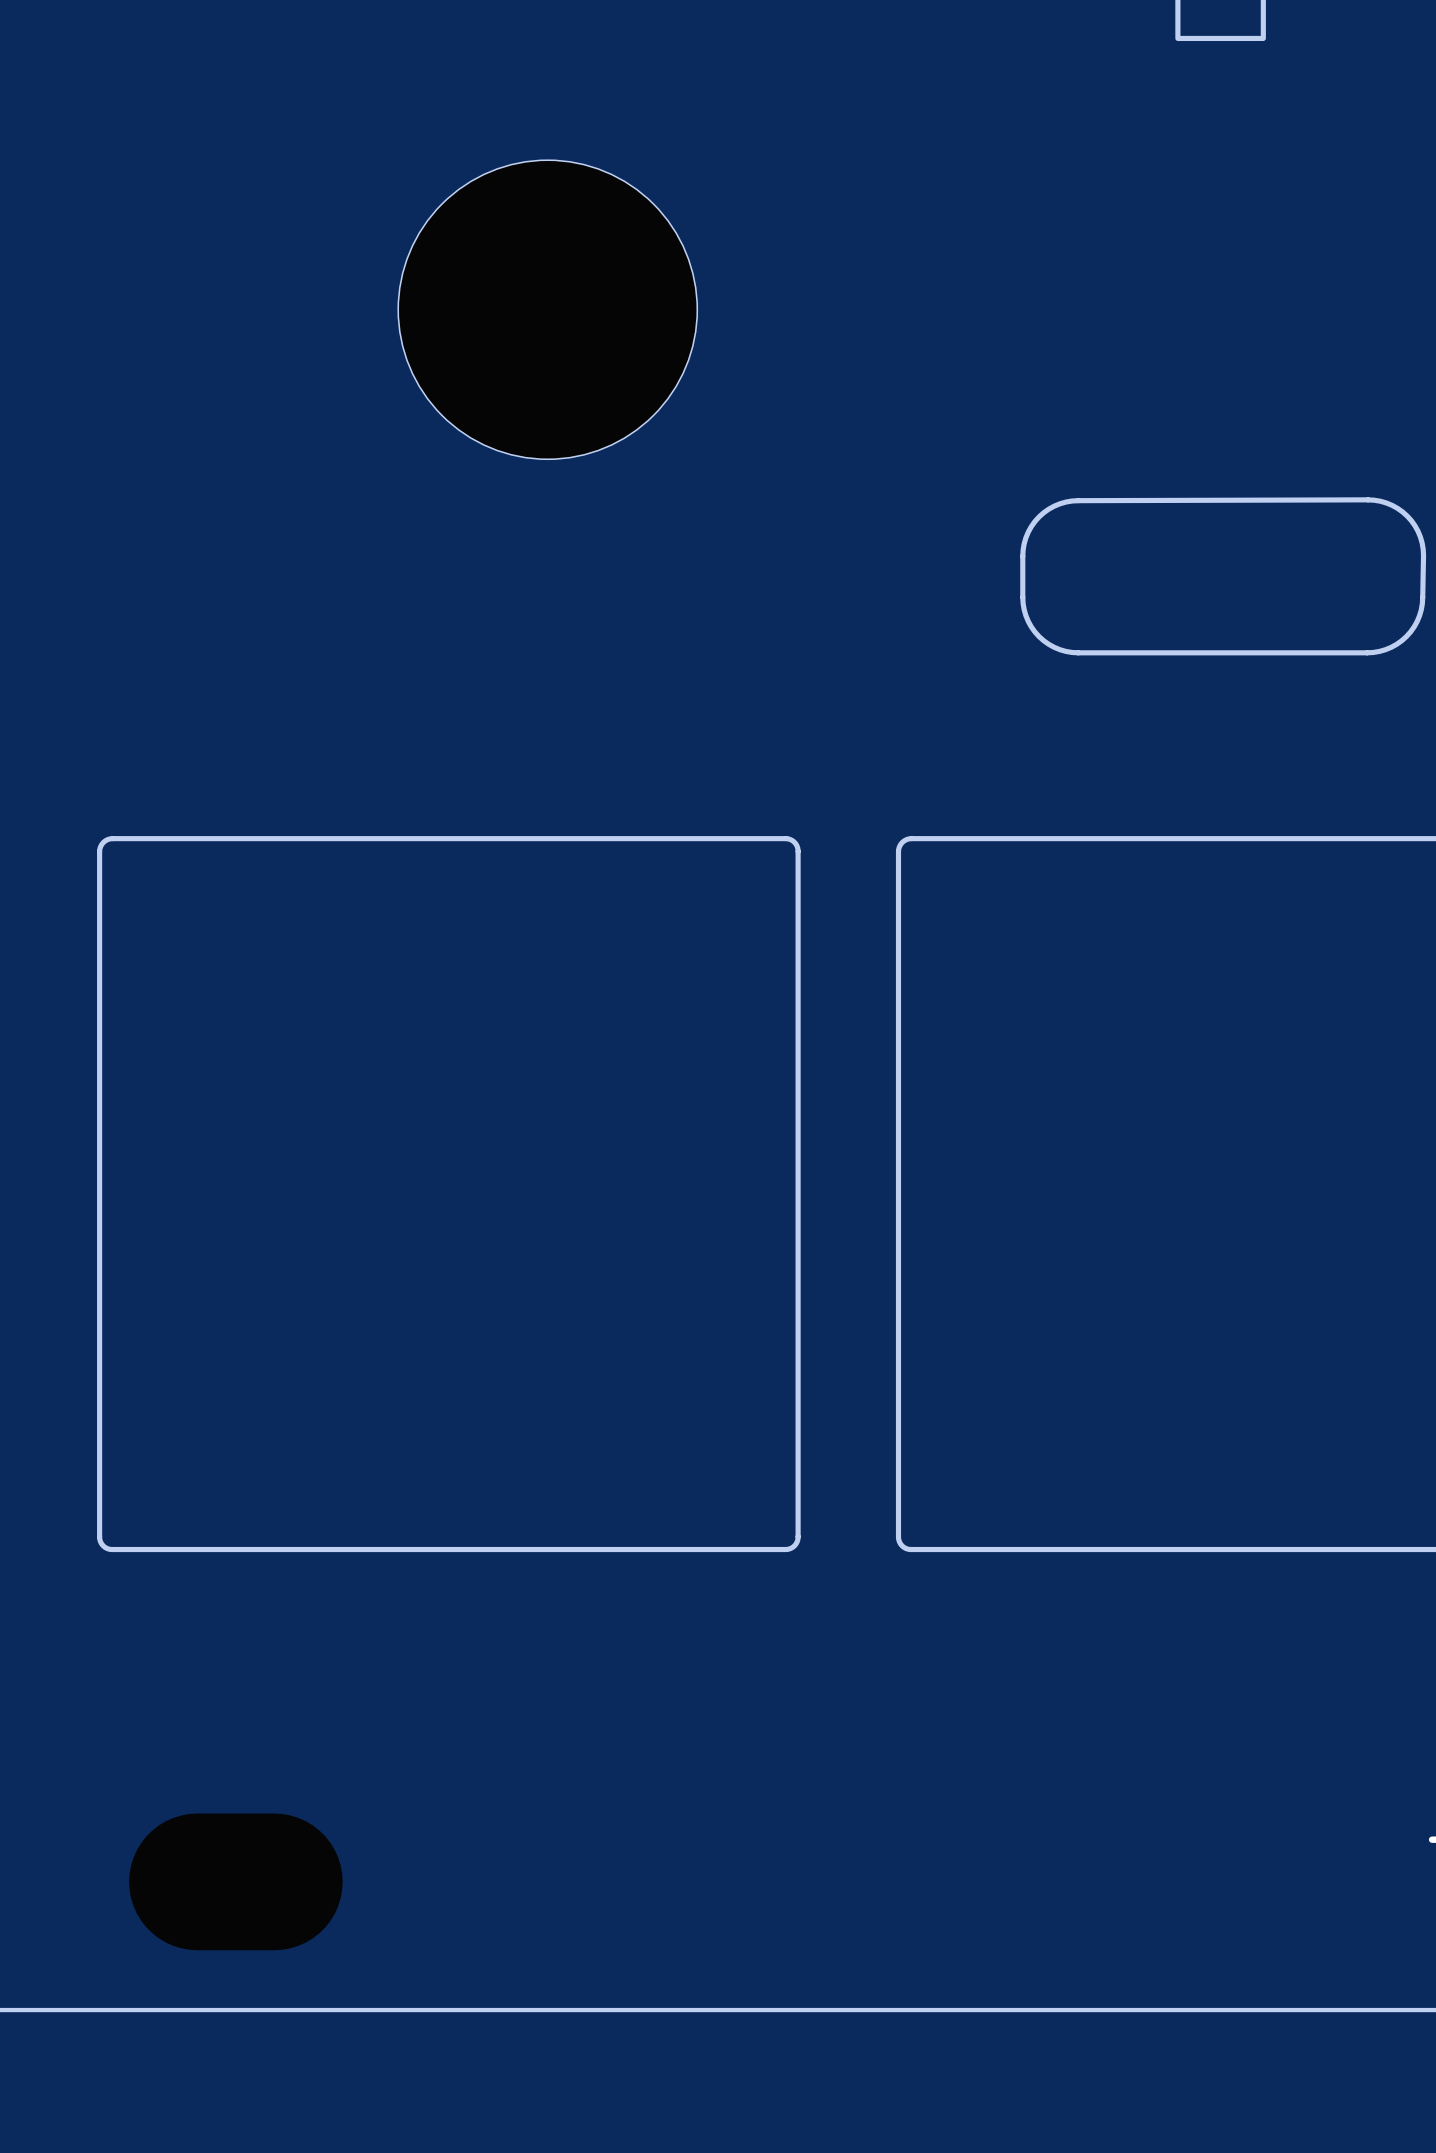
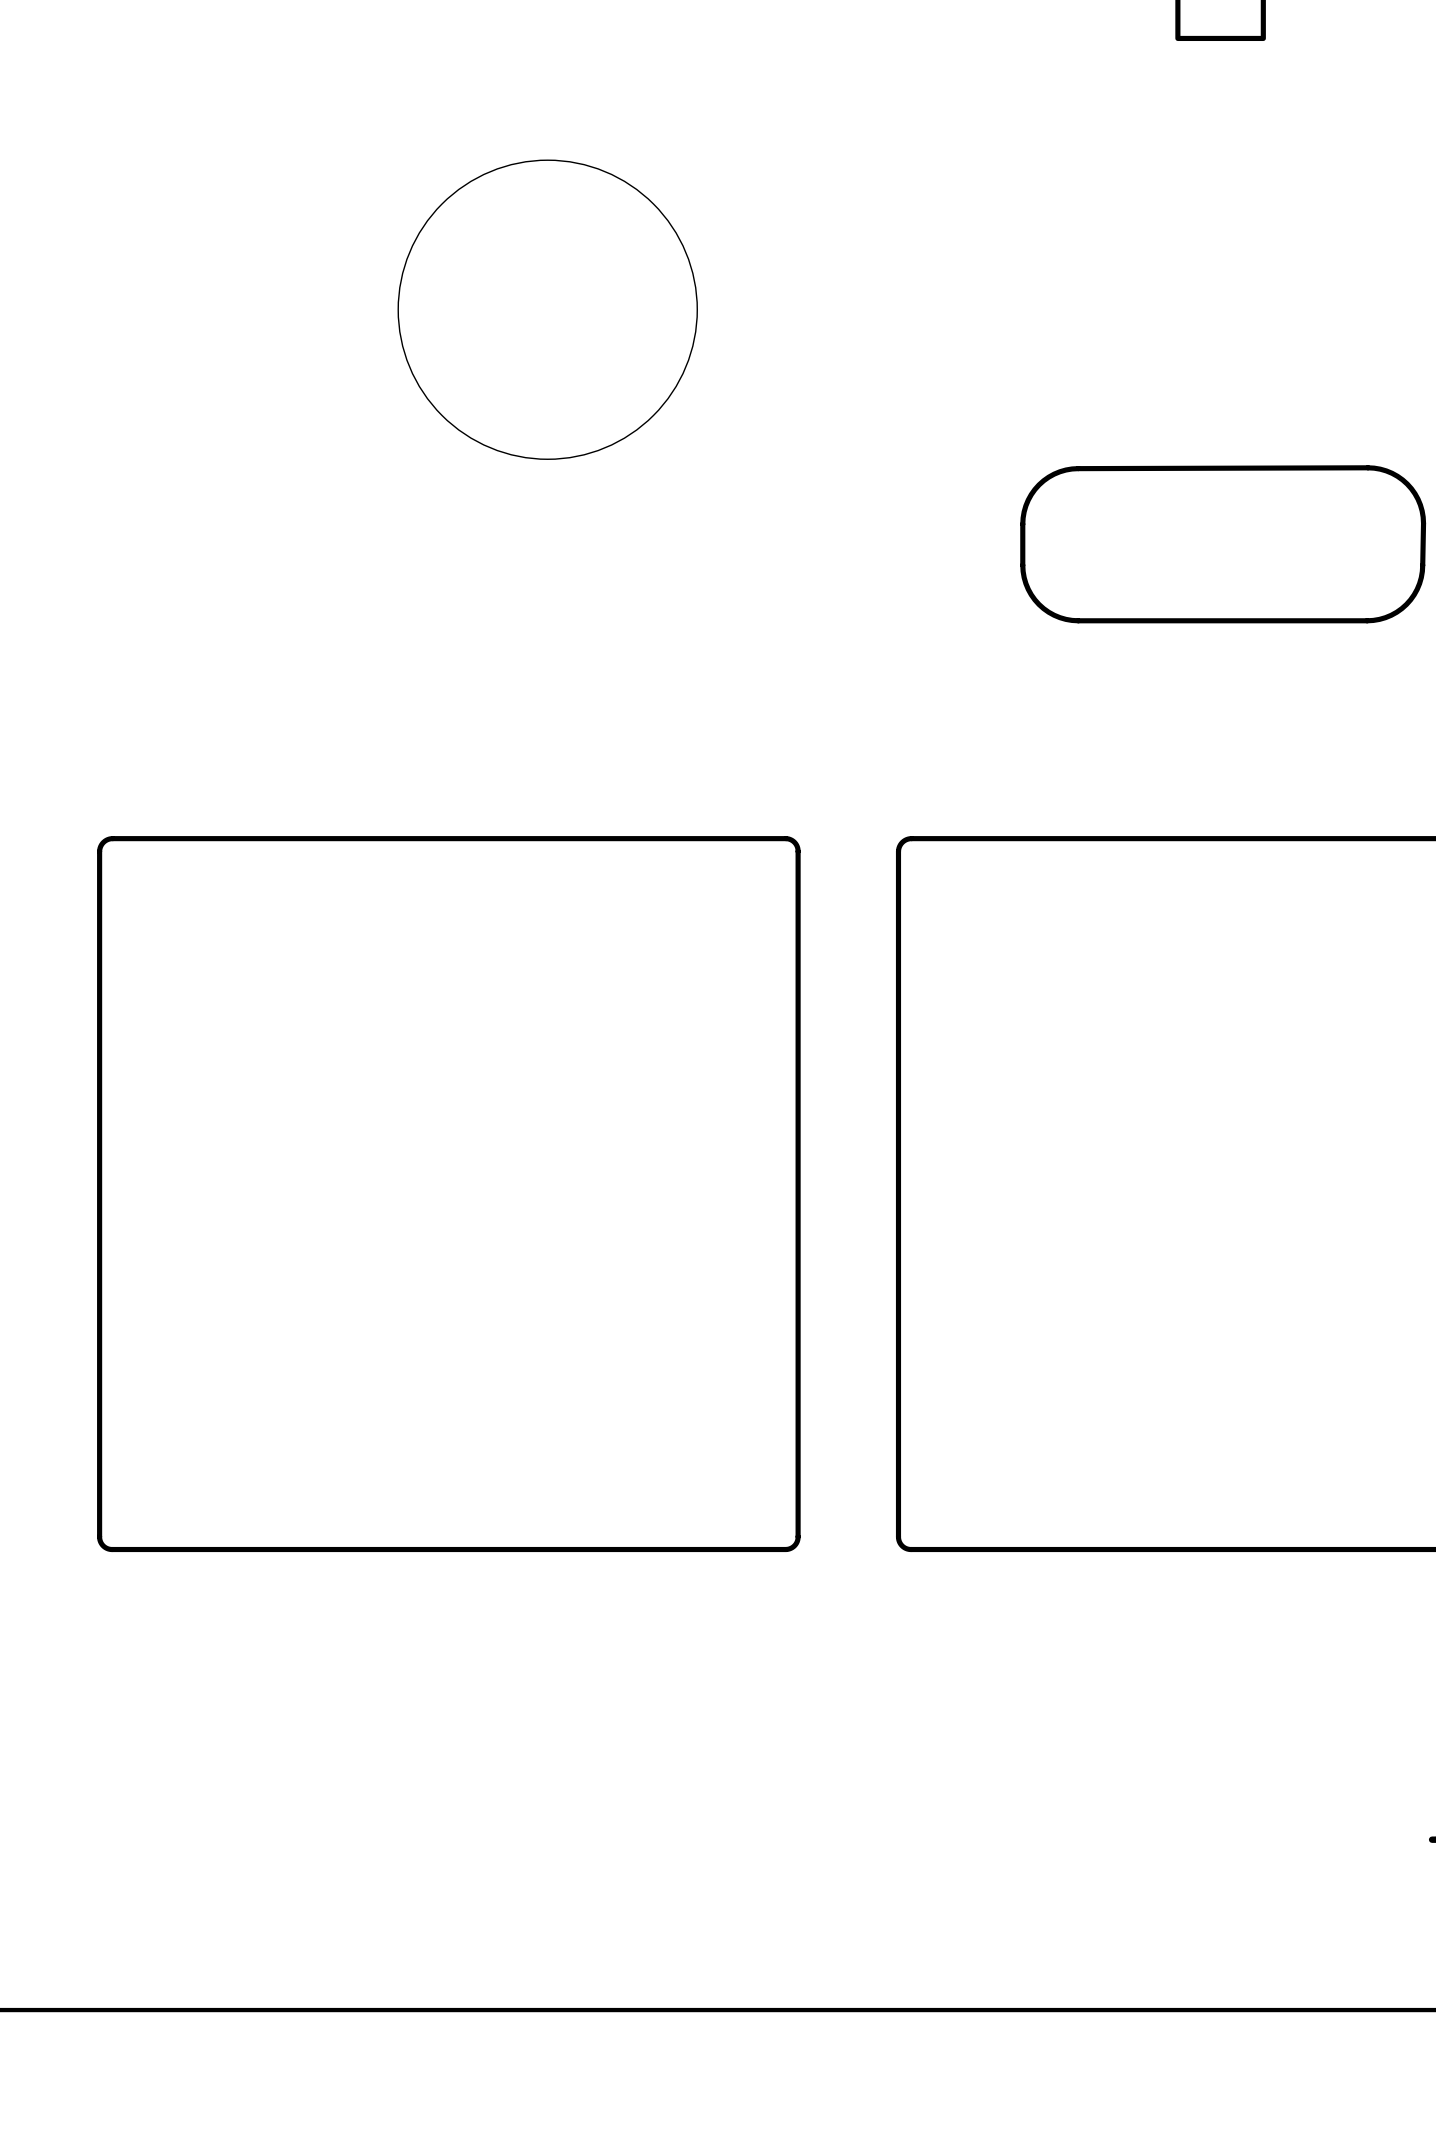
drawing position: (1223, 576) -> (1223, 544)

